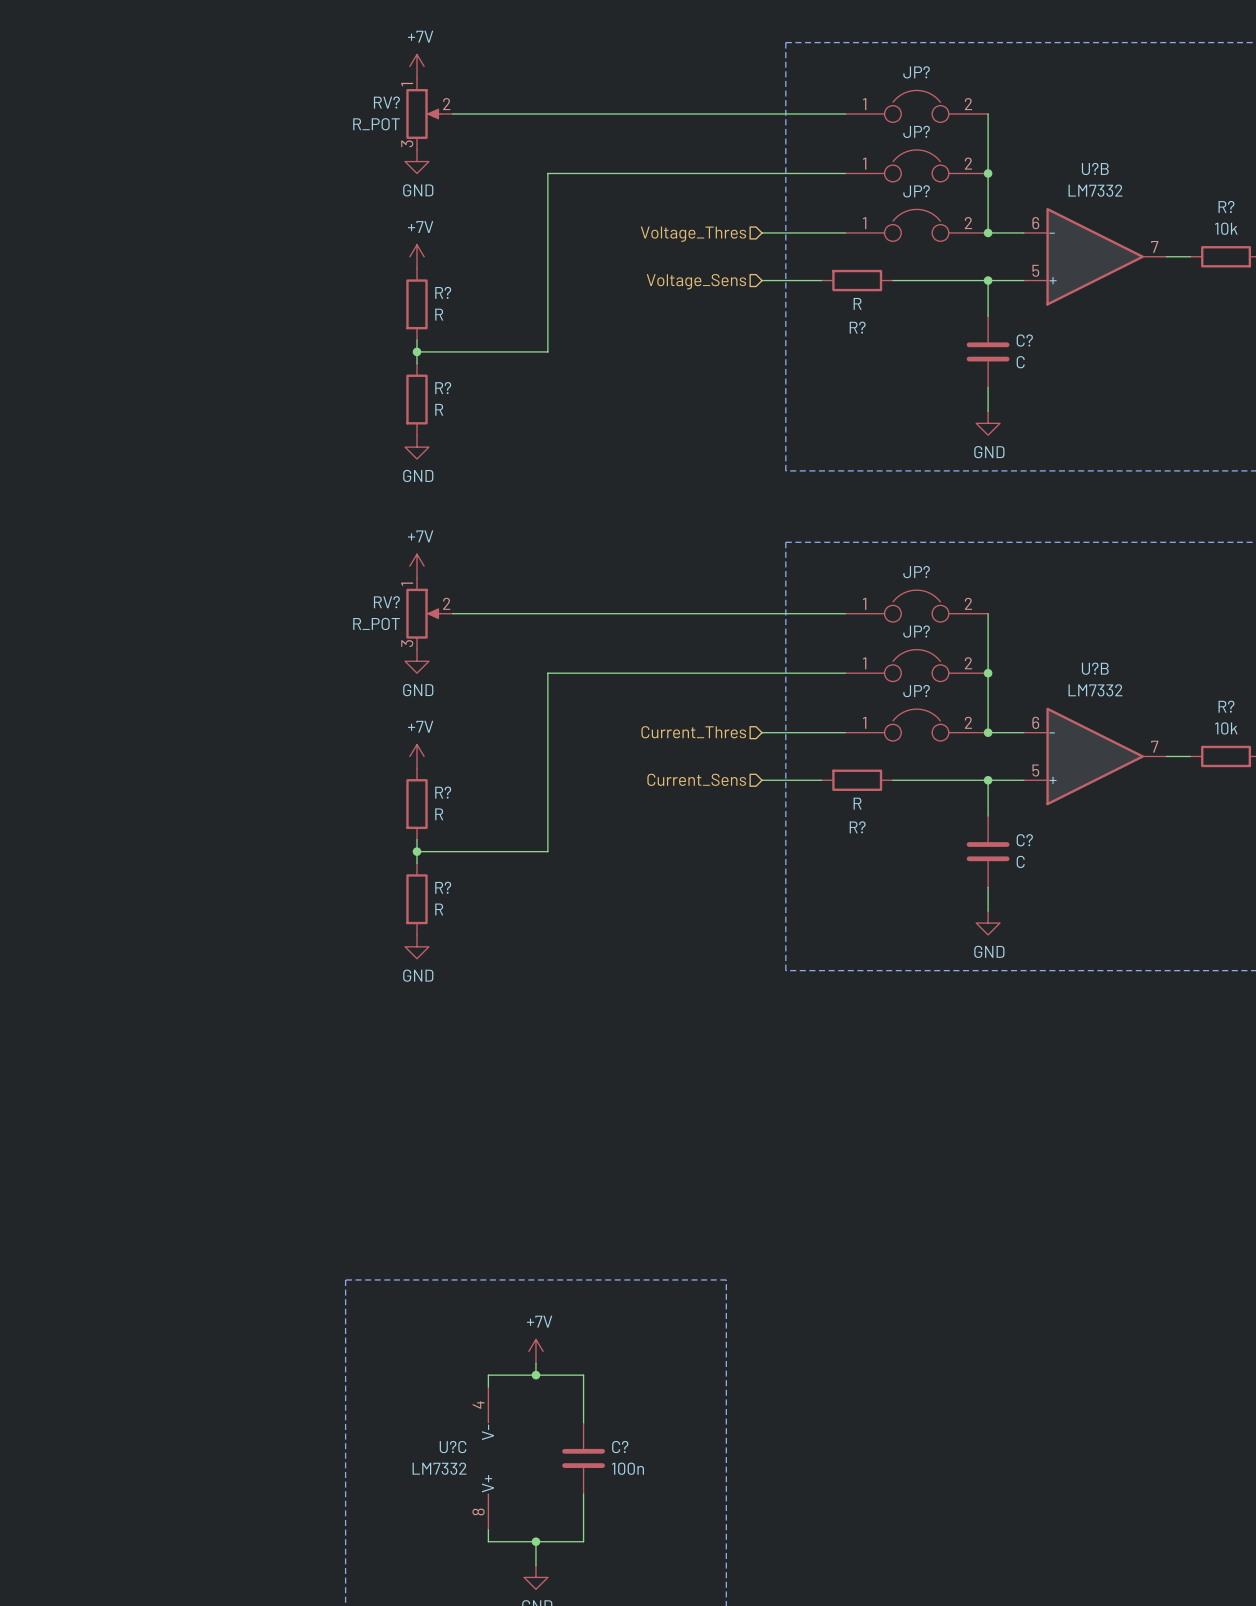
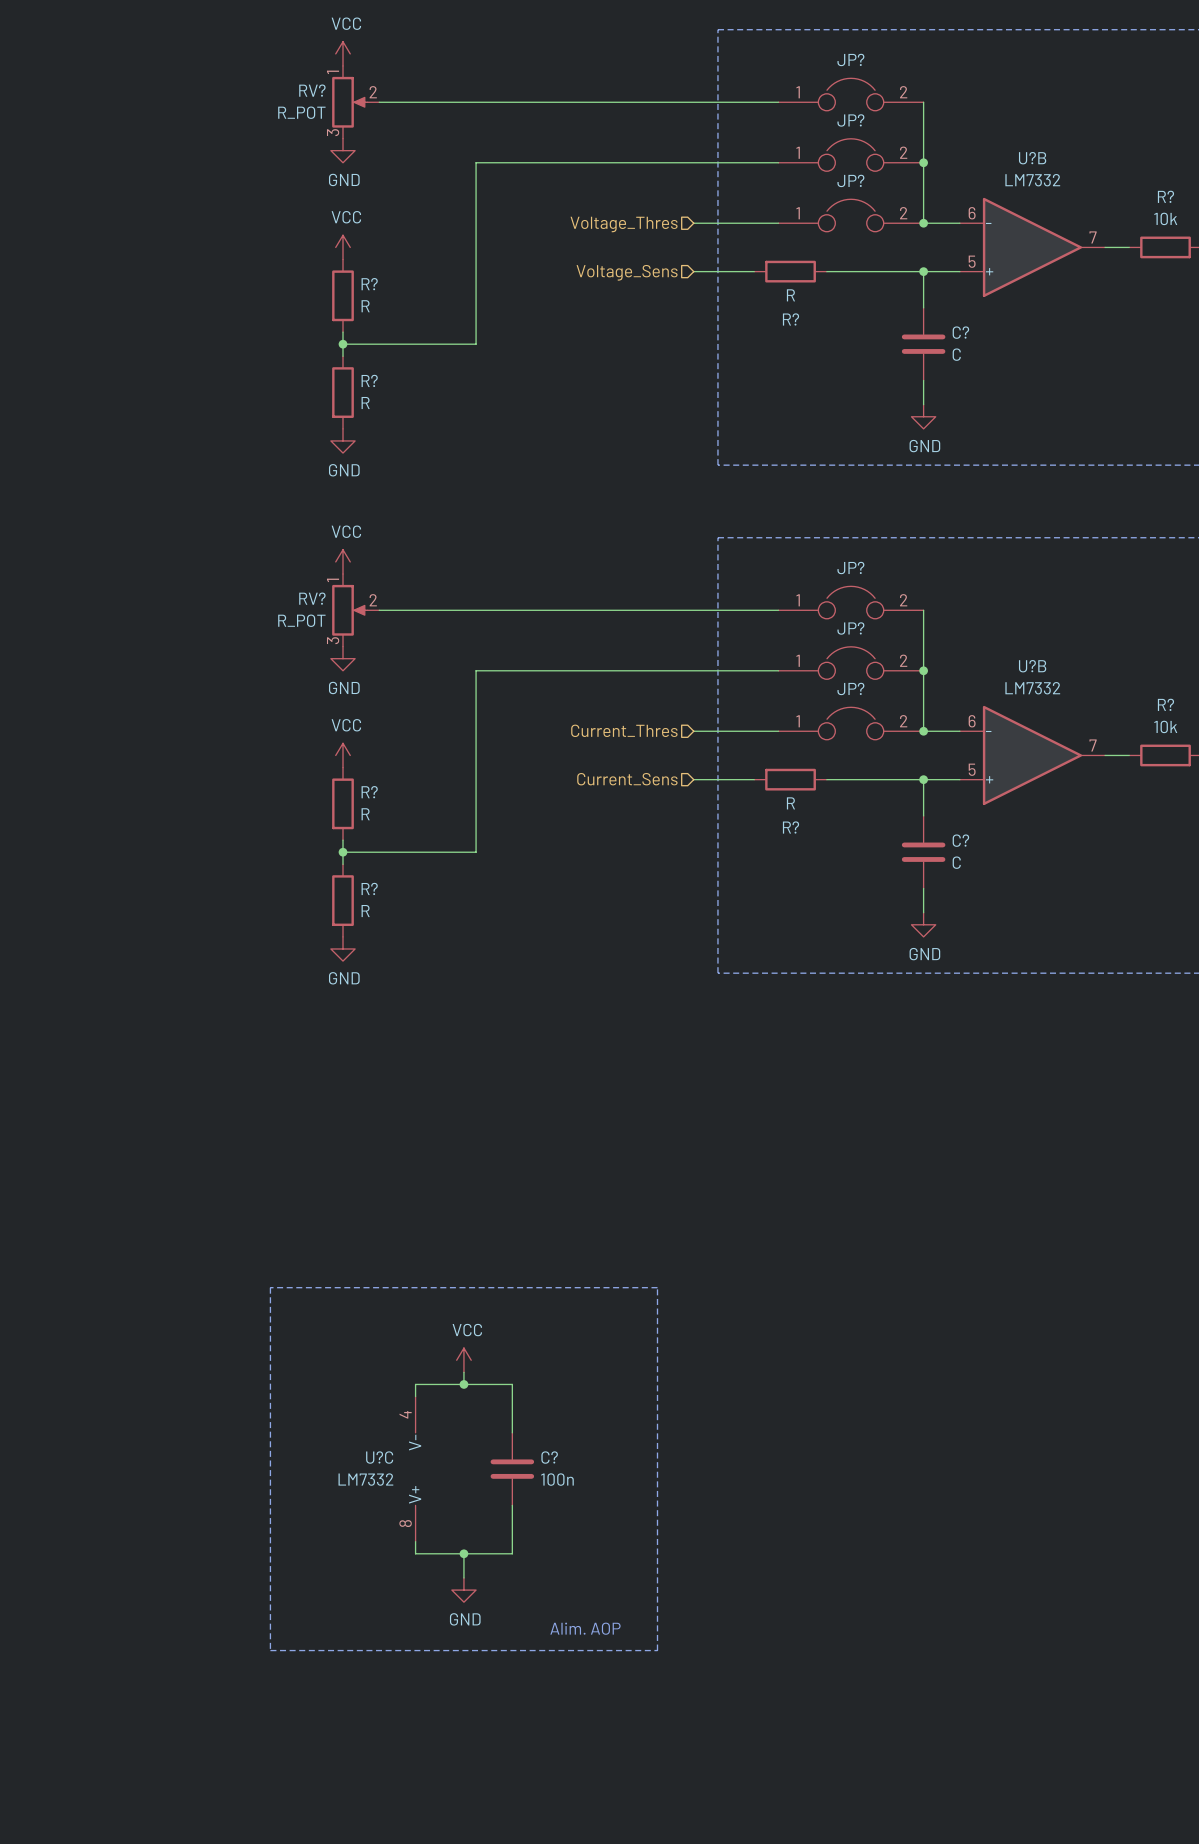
power symbol: +7V (417, 66) -> VCC (343, 53)
power symbol: +7V (417, 256) -> VCC (343, 247)
power symbol: +7V (417, 566) -> VCC (343, 561)
power symbol: +7V (417, 756) -> VCC (343, 755)
power symbol: +7V (535, 1351) -> VCC (463, 1360)

